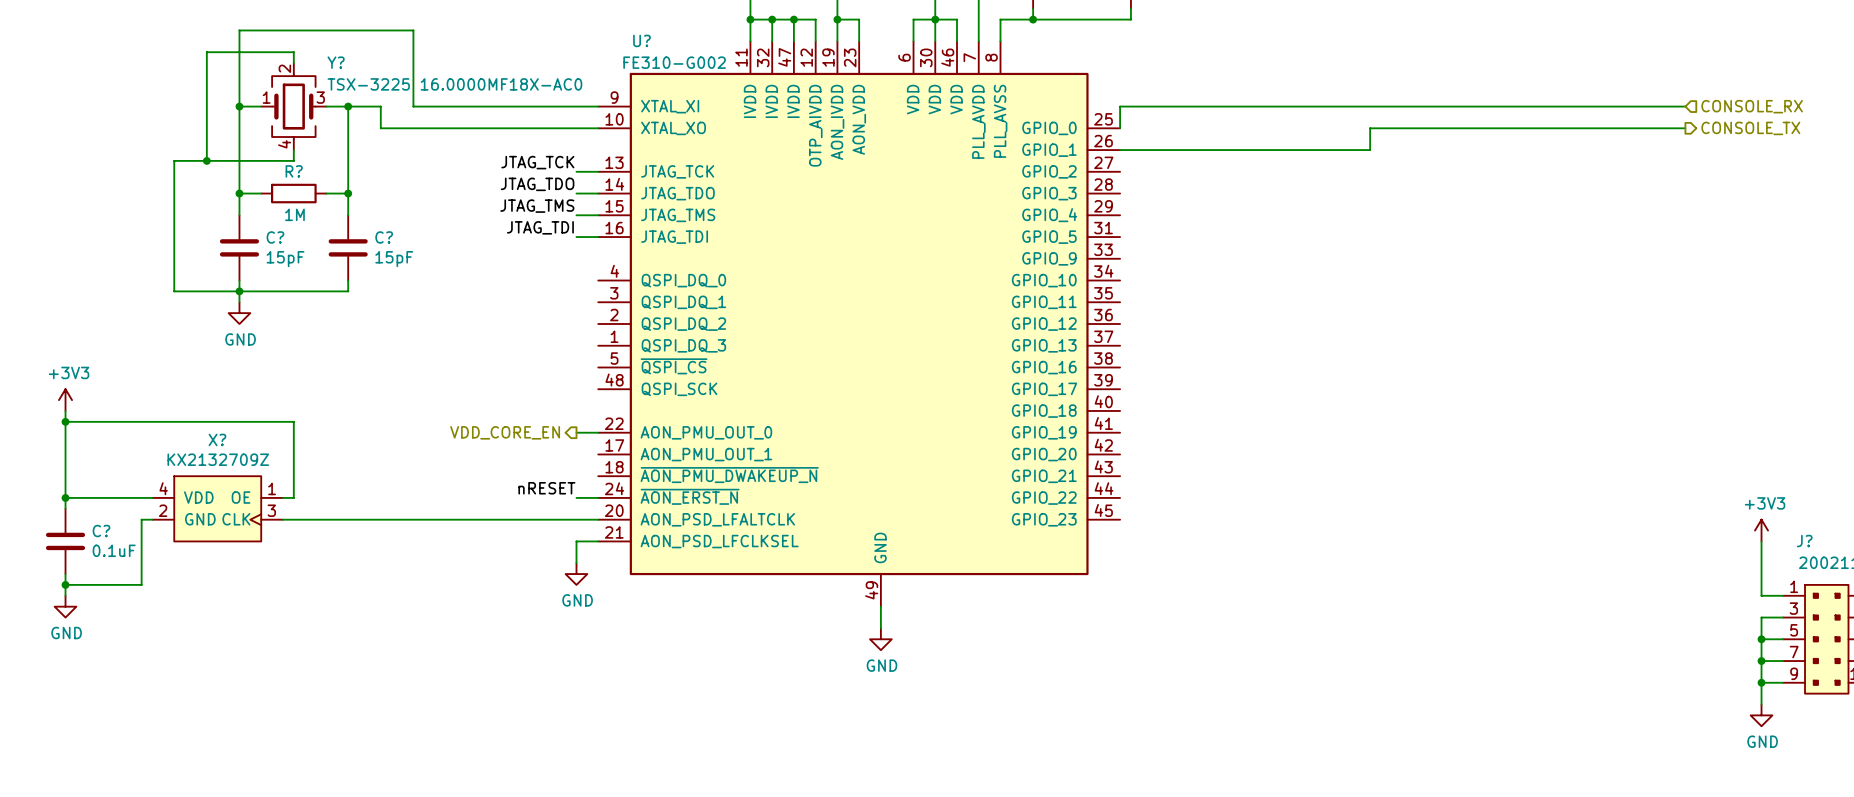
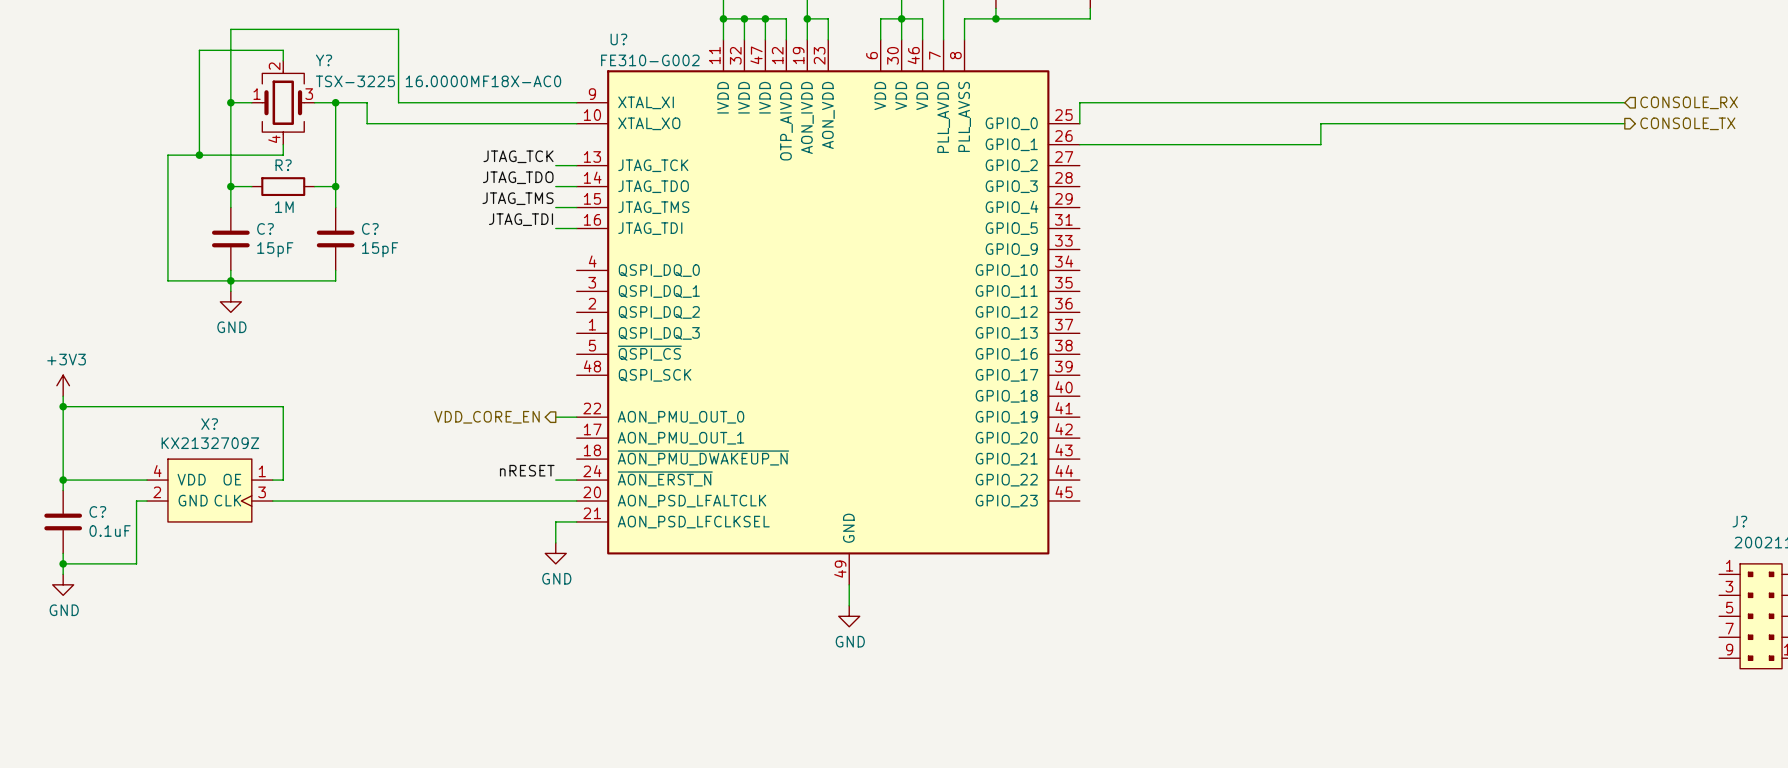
power symbol: +3V3 (1761, 530) -> none
wire: (1761, 541) (1761, 595) (1783, 595) -> none
wire: (1783, 617) (1761, 617) (1761, 704) -> none
wire: (1761, 639) (1783, 639) -> none
junction: (1761, 639) -> none
wire: (1761, 661) (1783, 661) -> none
junction: (1761, 661) -> none
wire: (1761, 682) (1783, 682) -> none
junction: (1761, 682) -> none
power symbol: GND (1761, 715) -> none

